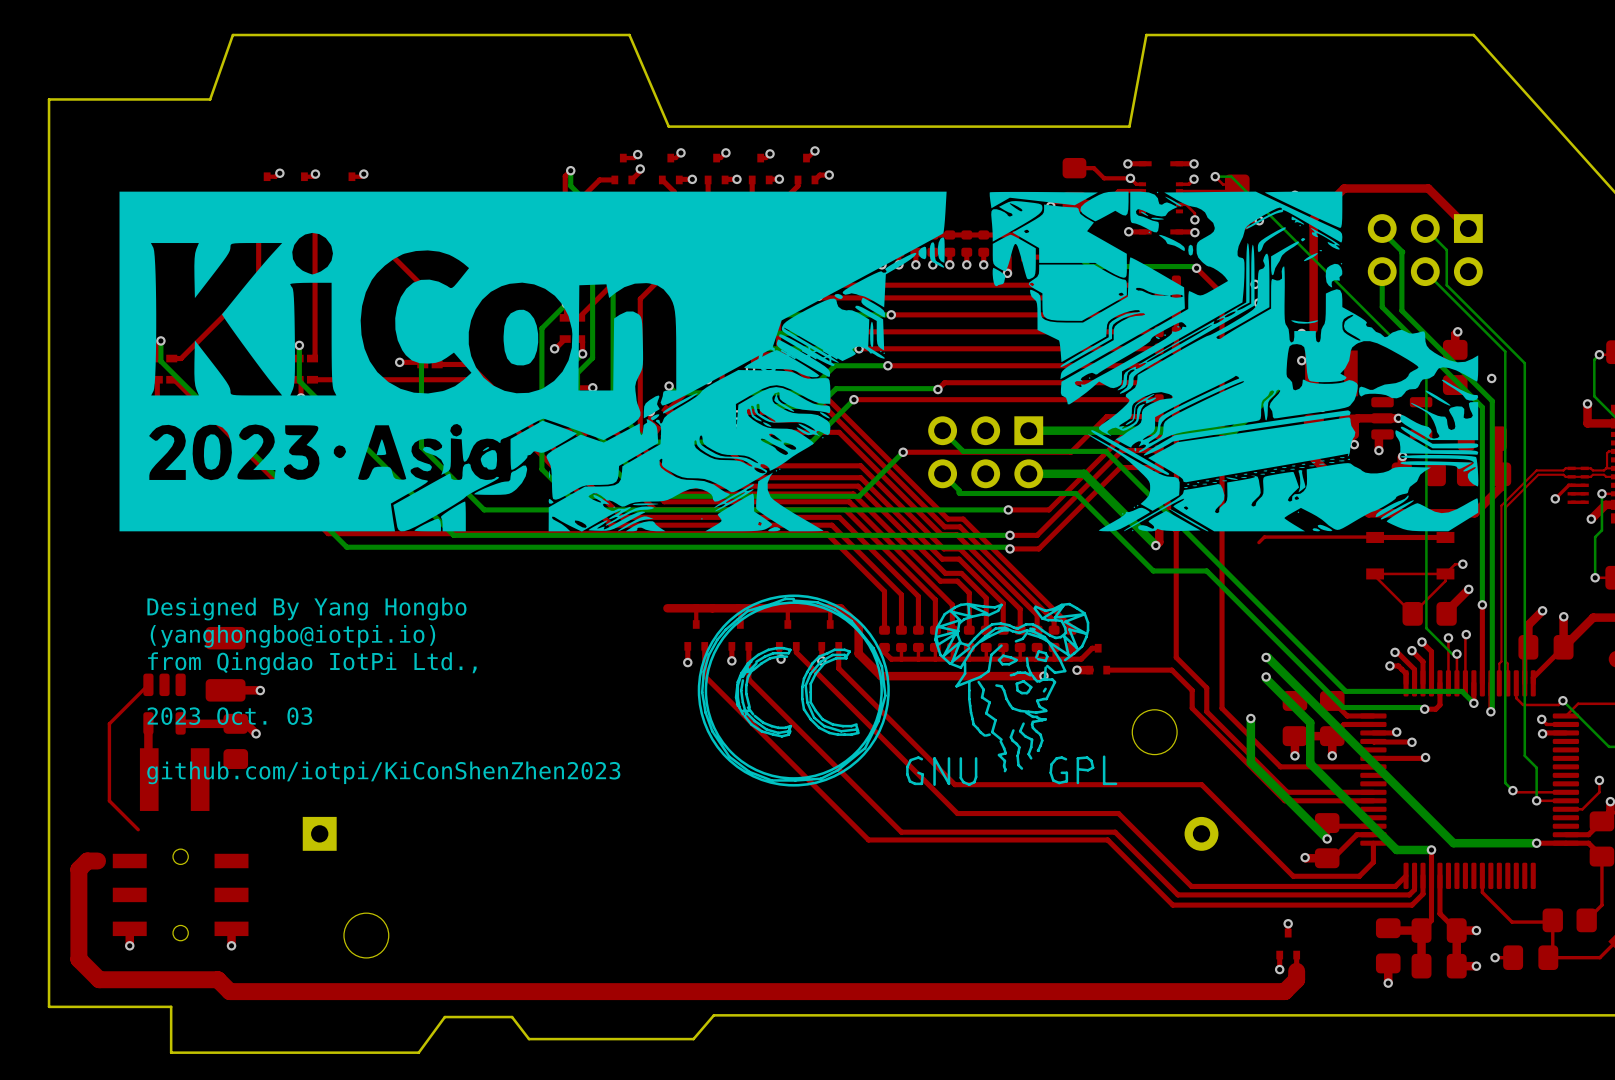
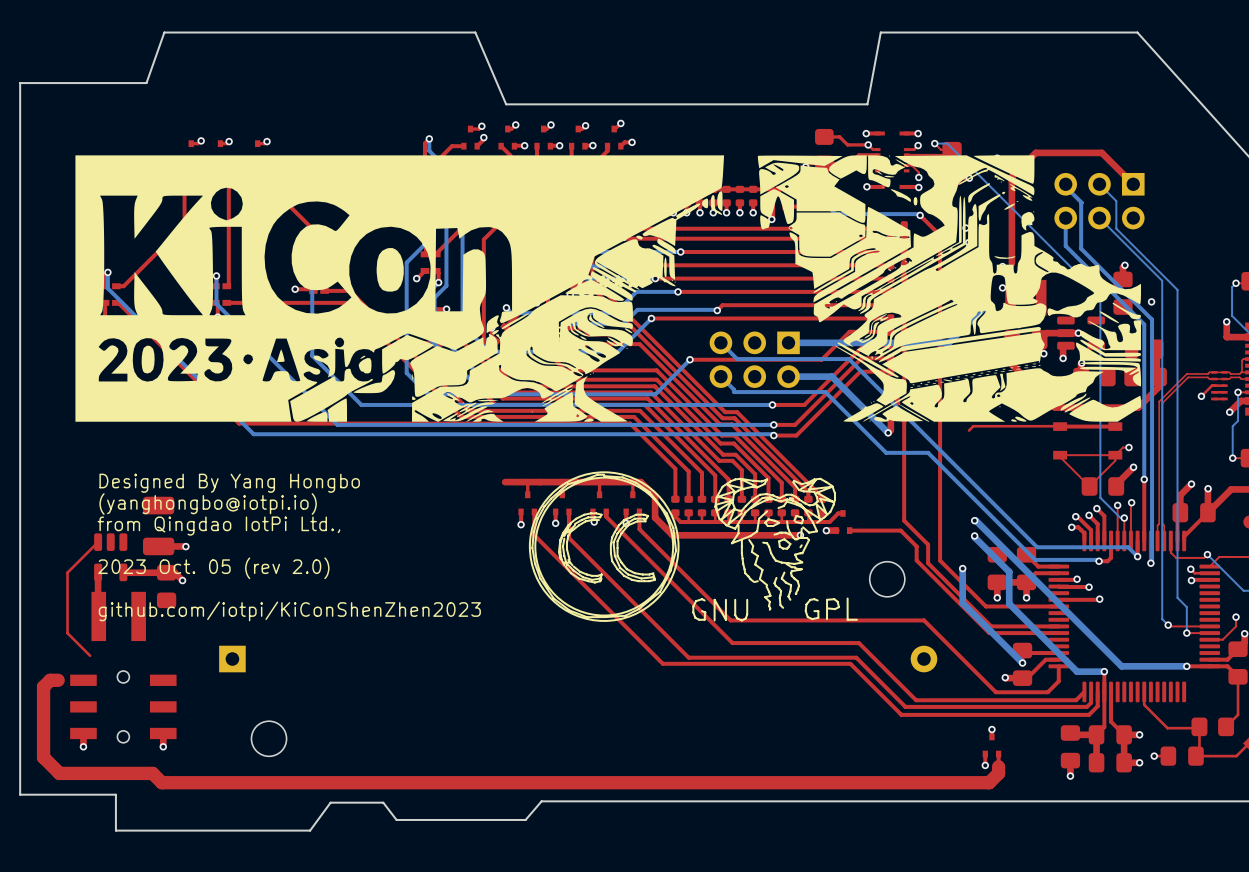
text: 2023 Oct. 03 (229, 716) -> 2023 Oct. 05 (rev 2.0) (213, 568)

